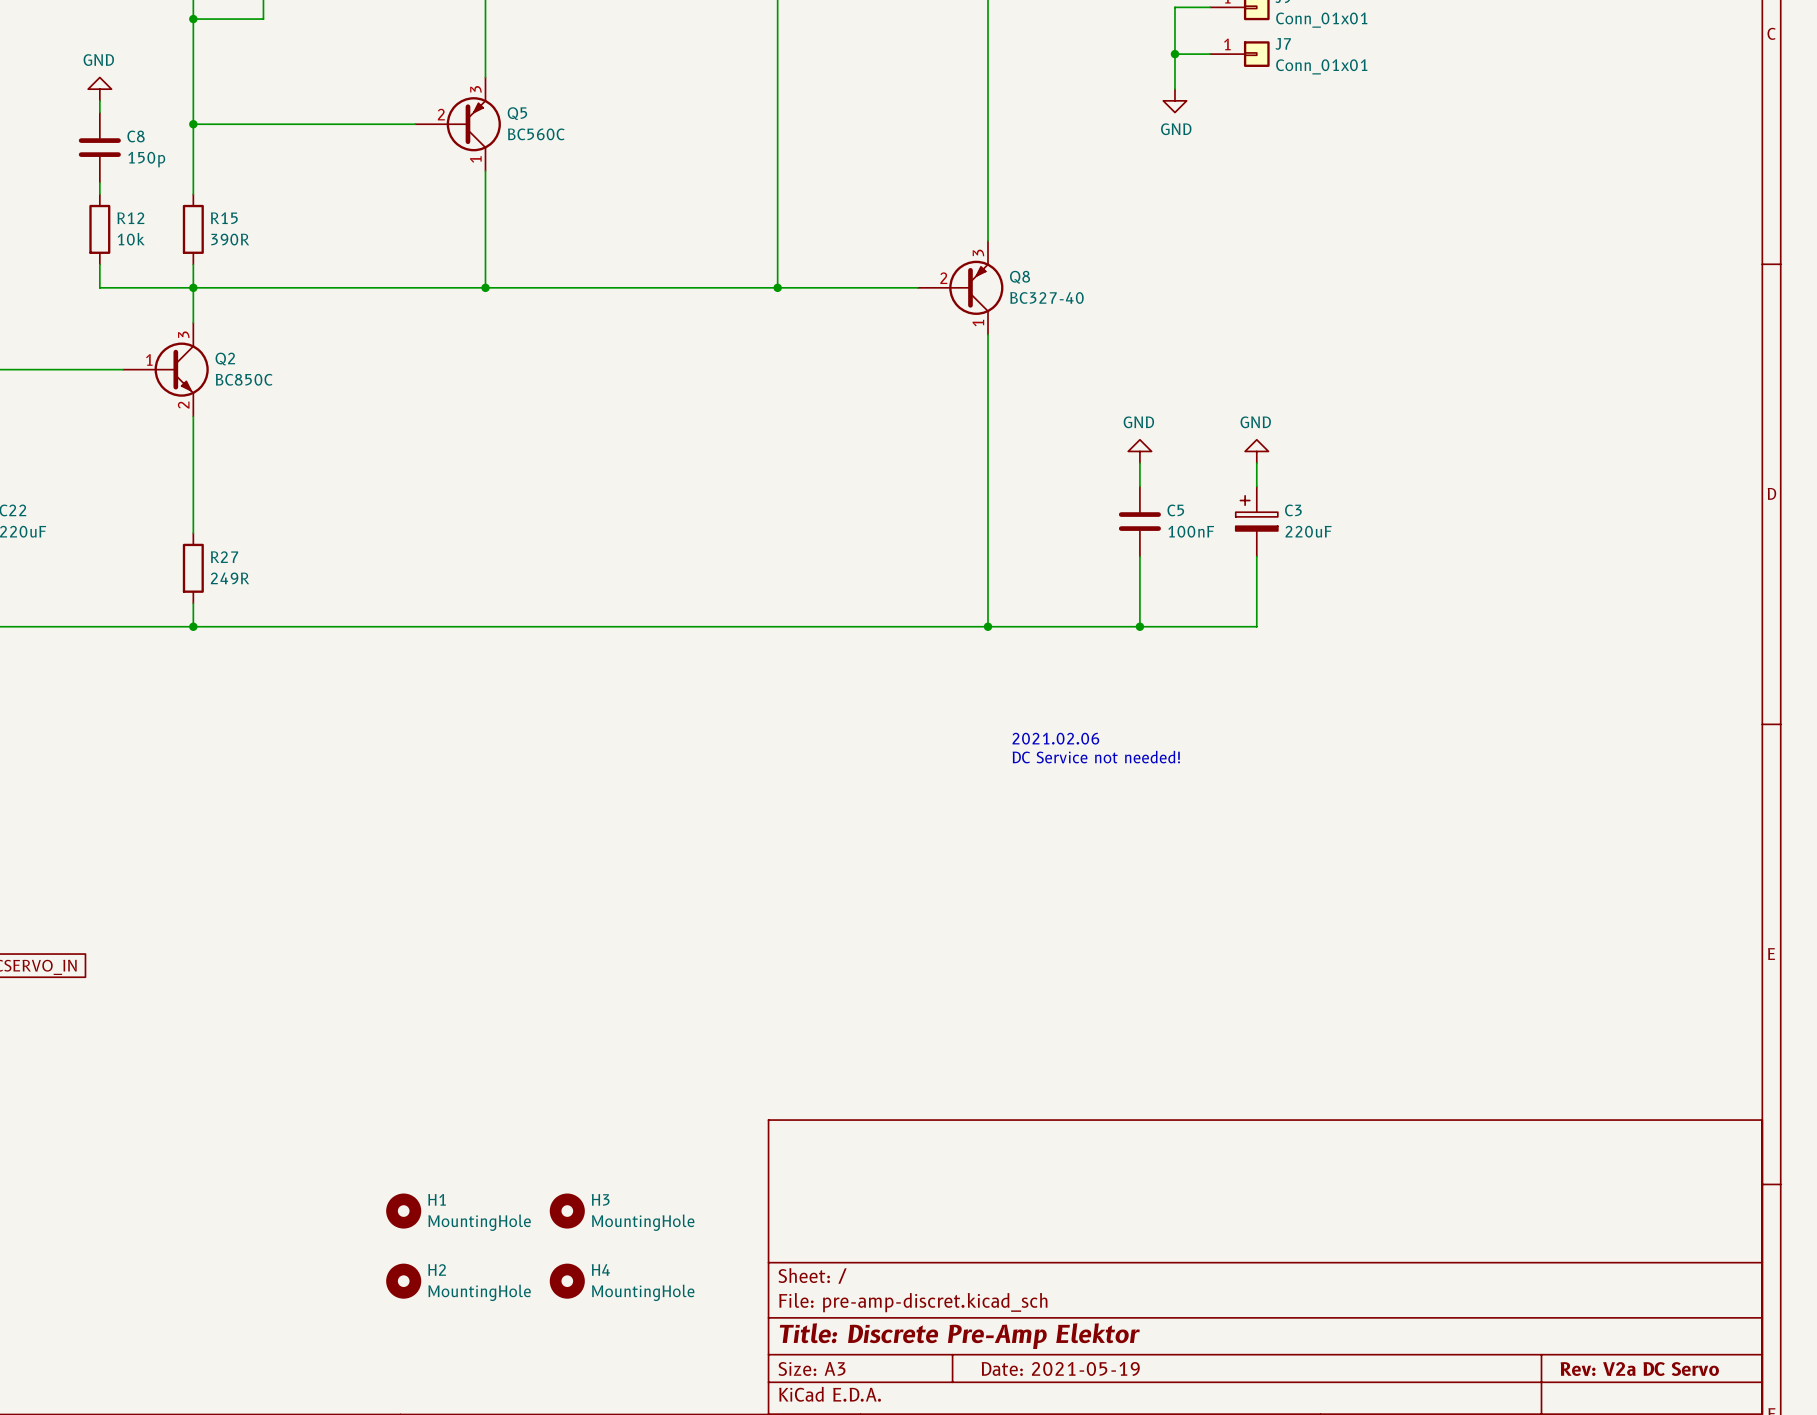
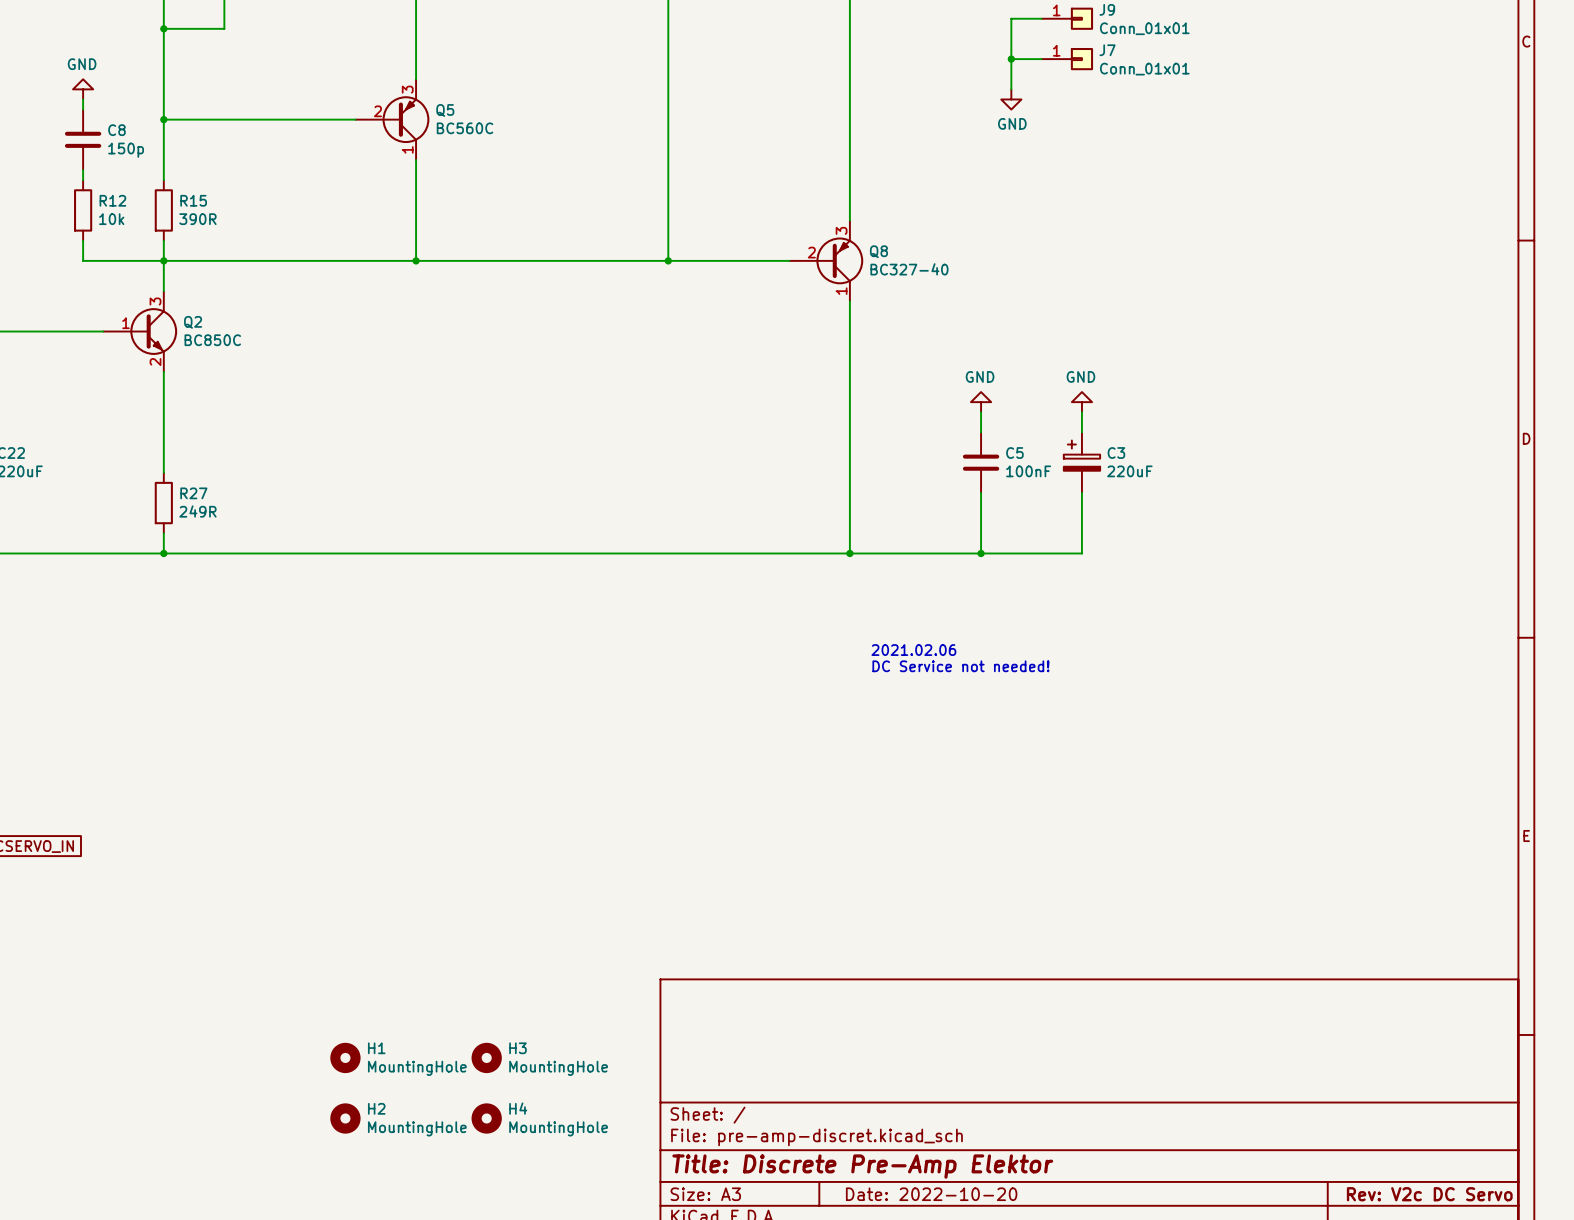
title block: Date: 2021-05-19 (1060, 1368) -> Date: 2022-10-20 (931, 1194)
title block: Rev: V2a DC Servo (1639, 1369) -> Rev: V2c DC Servo (1429, 1194)

